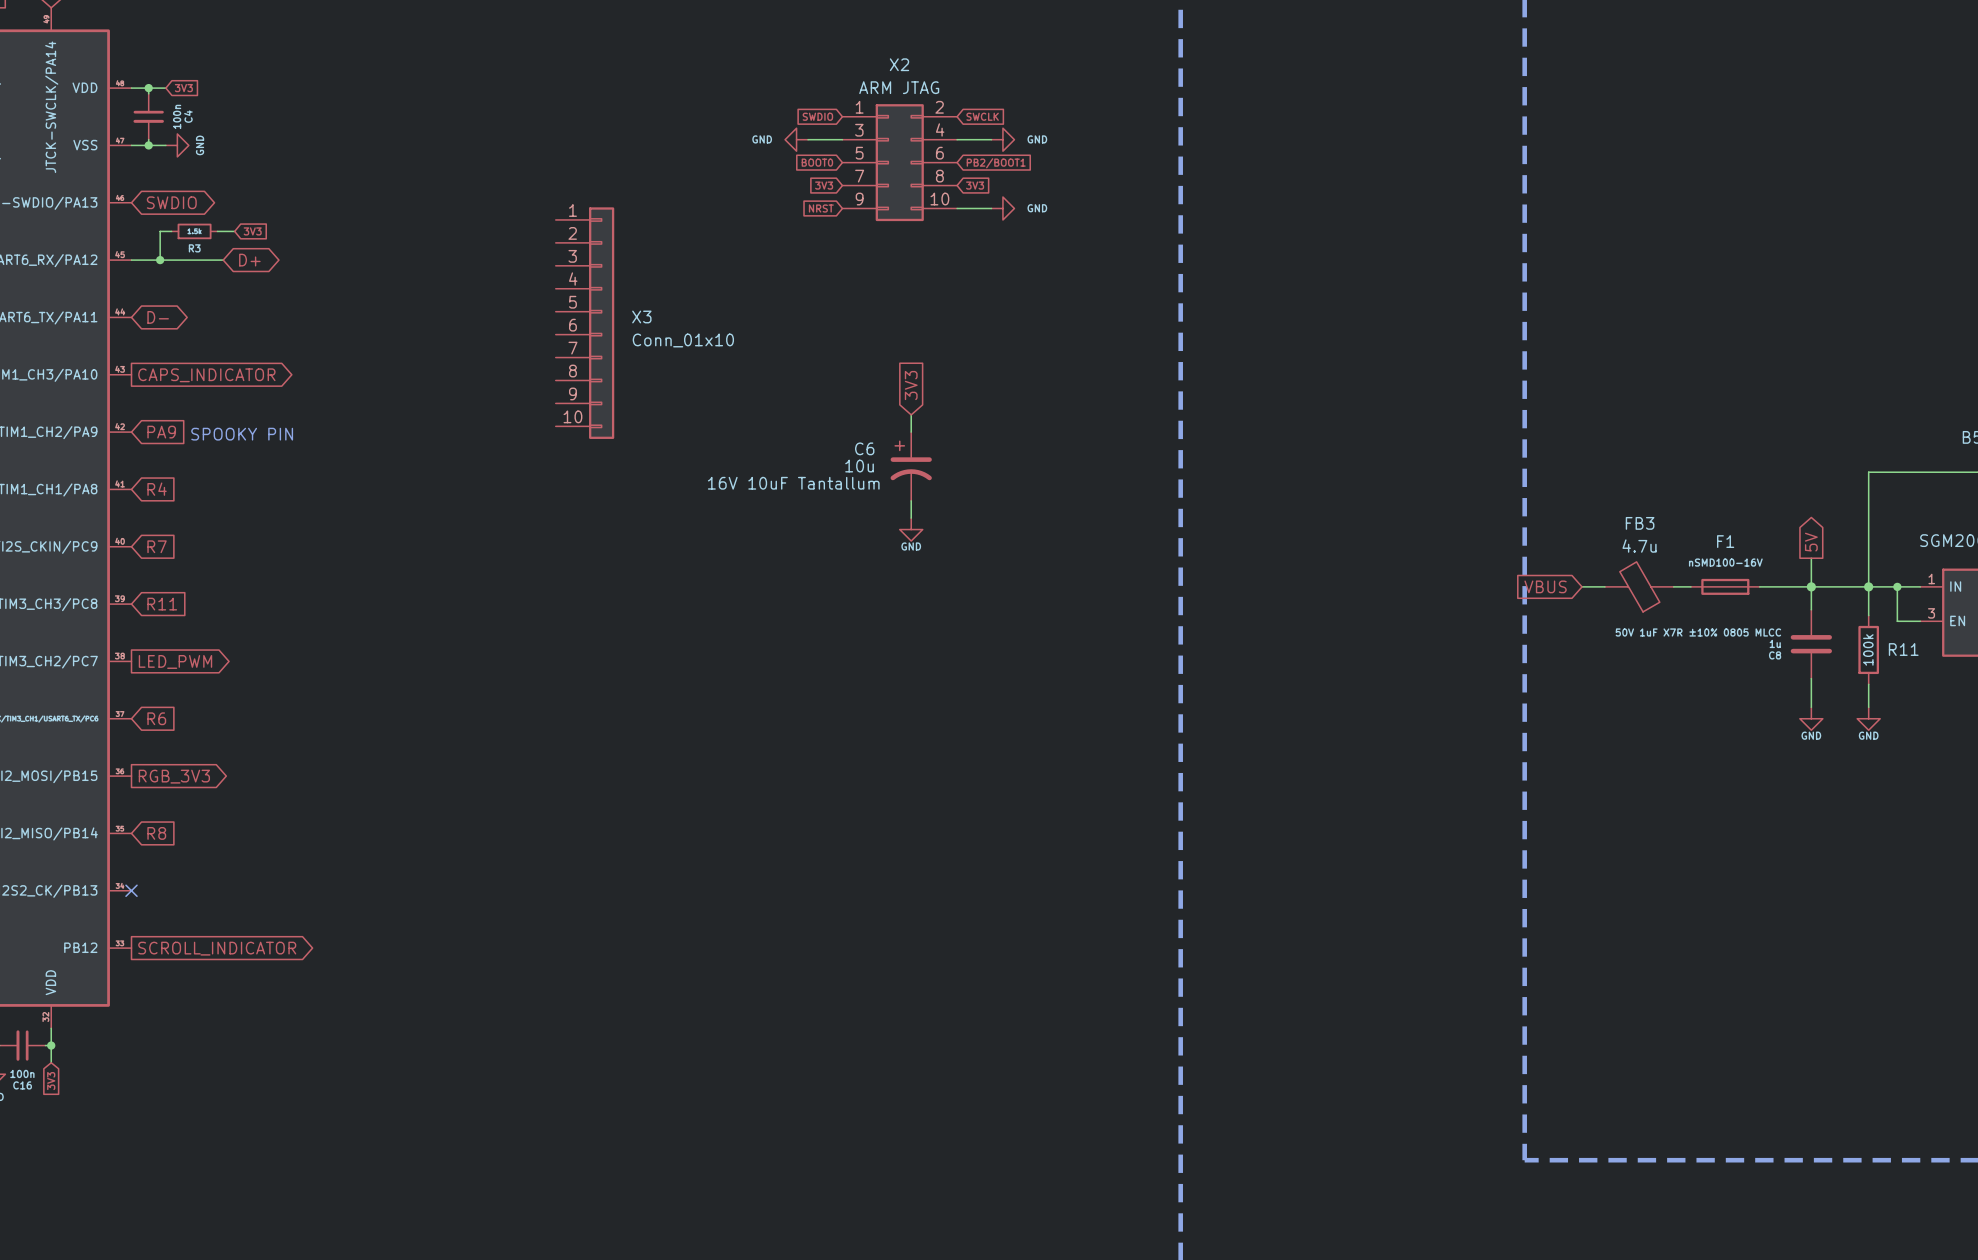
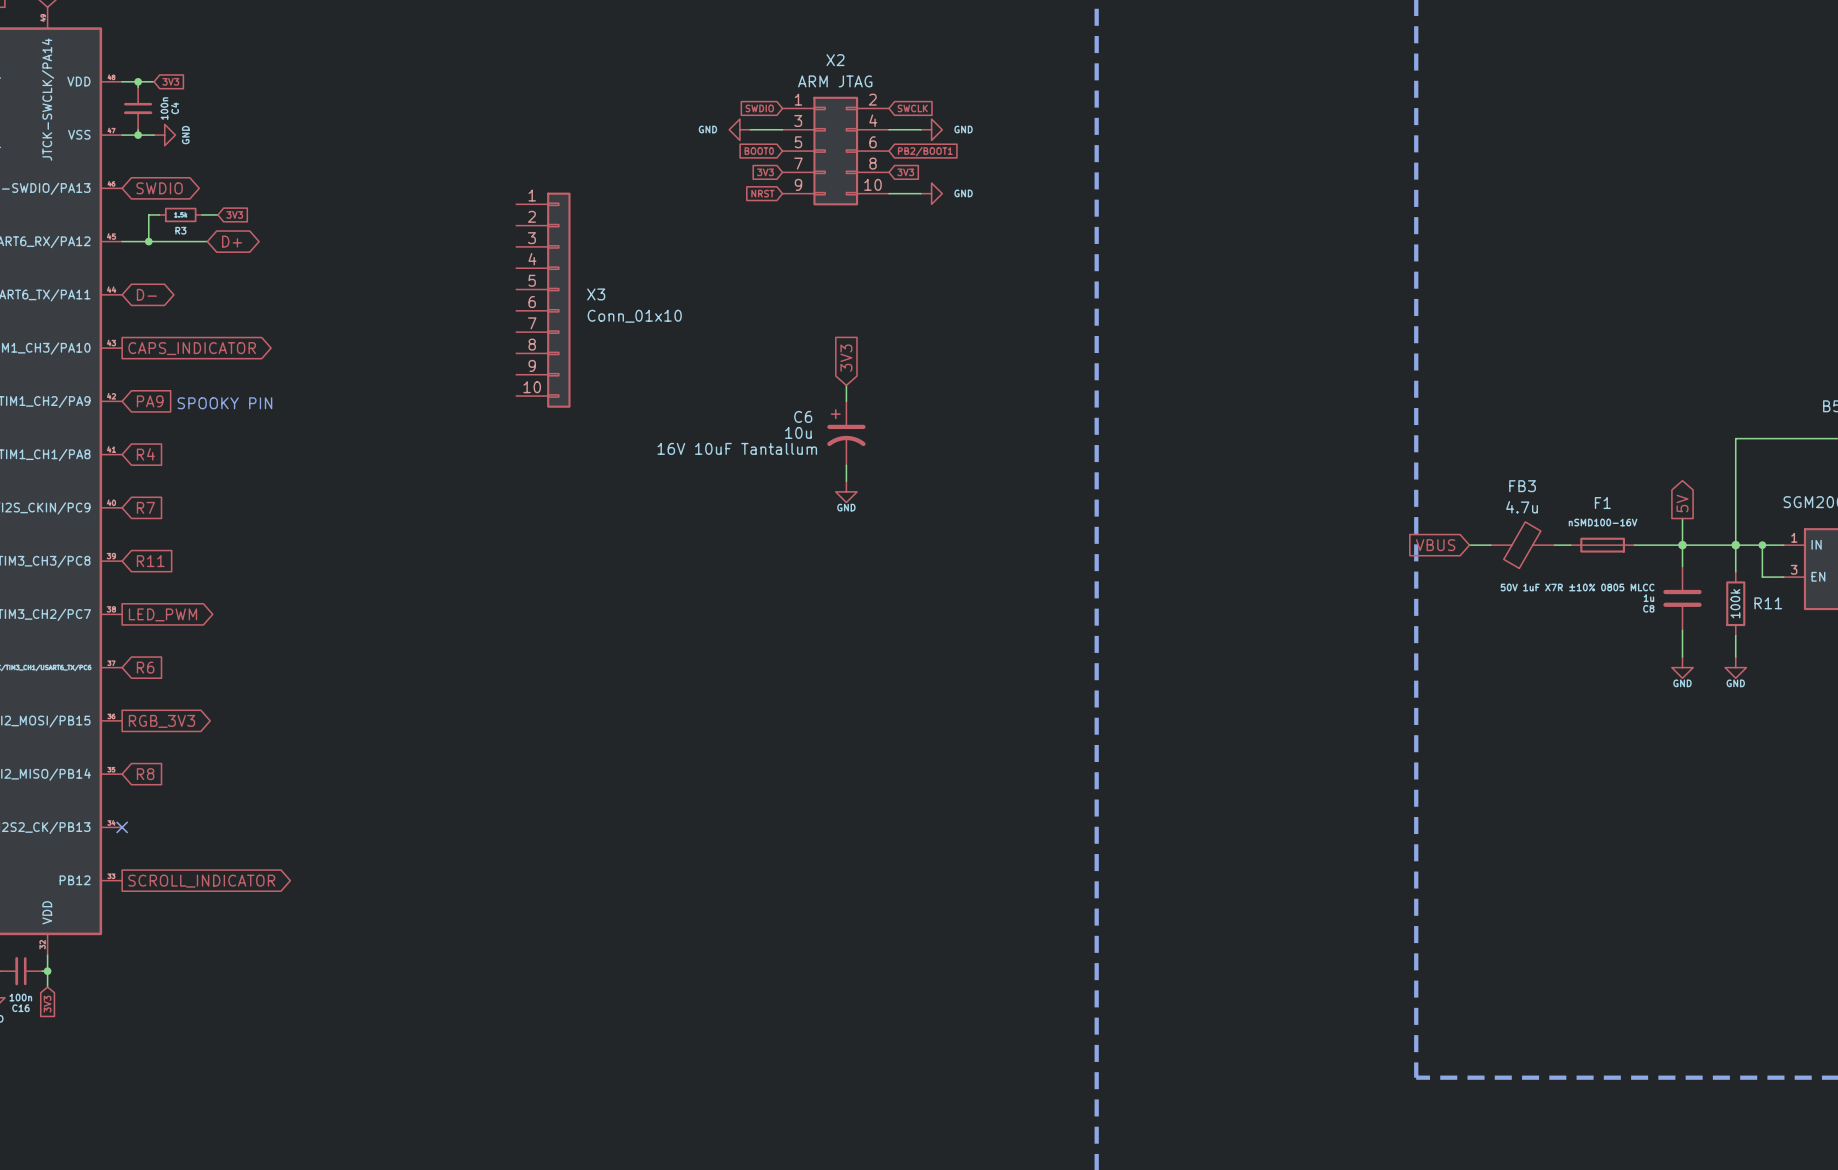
FB3 flip: as is (1639, 586) -> left-right (1522, 545)

